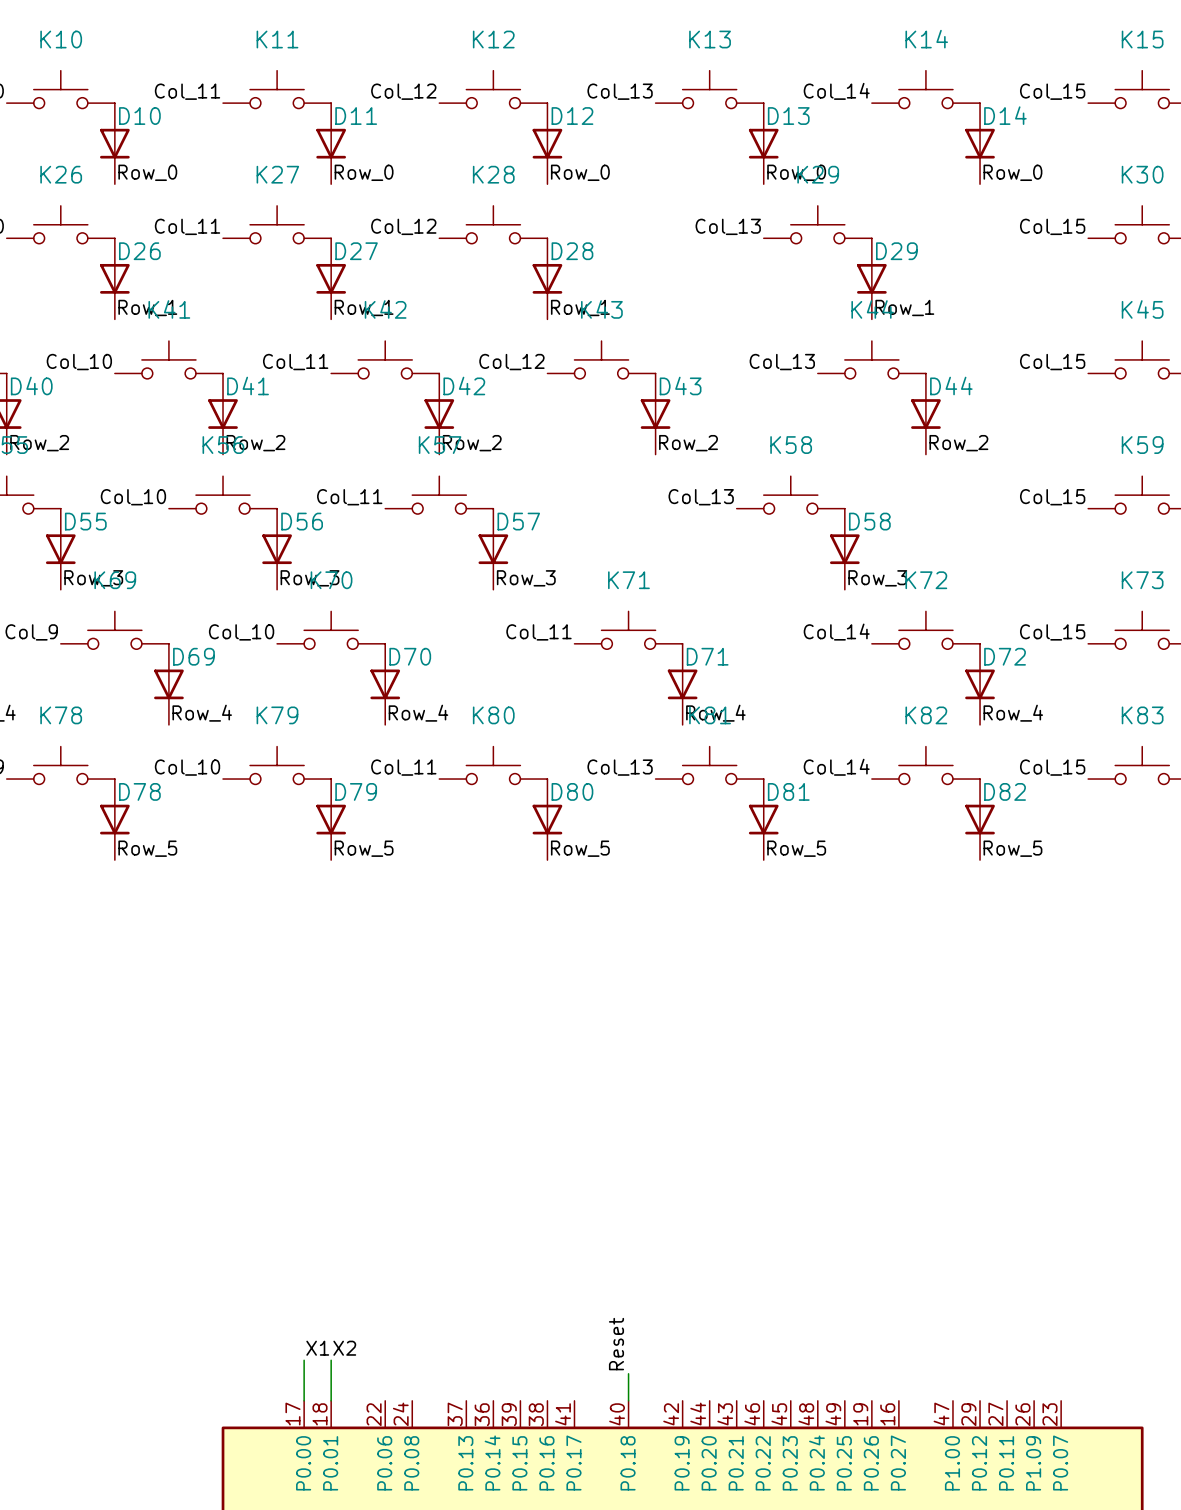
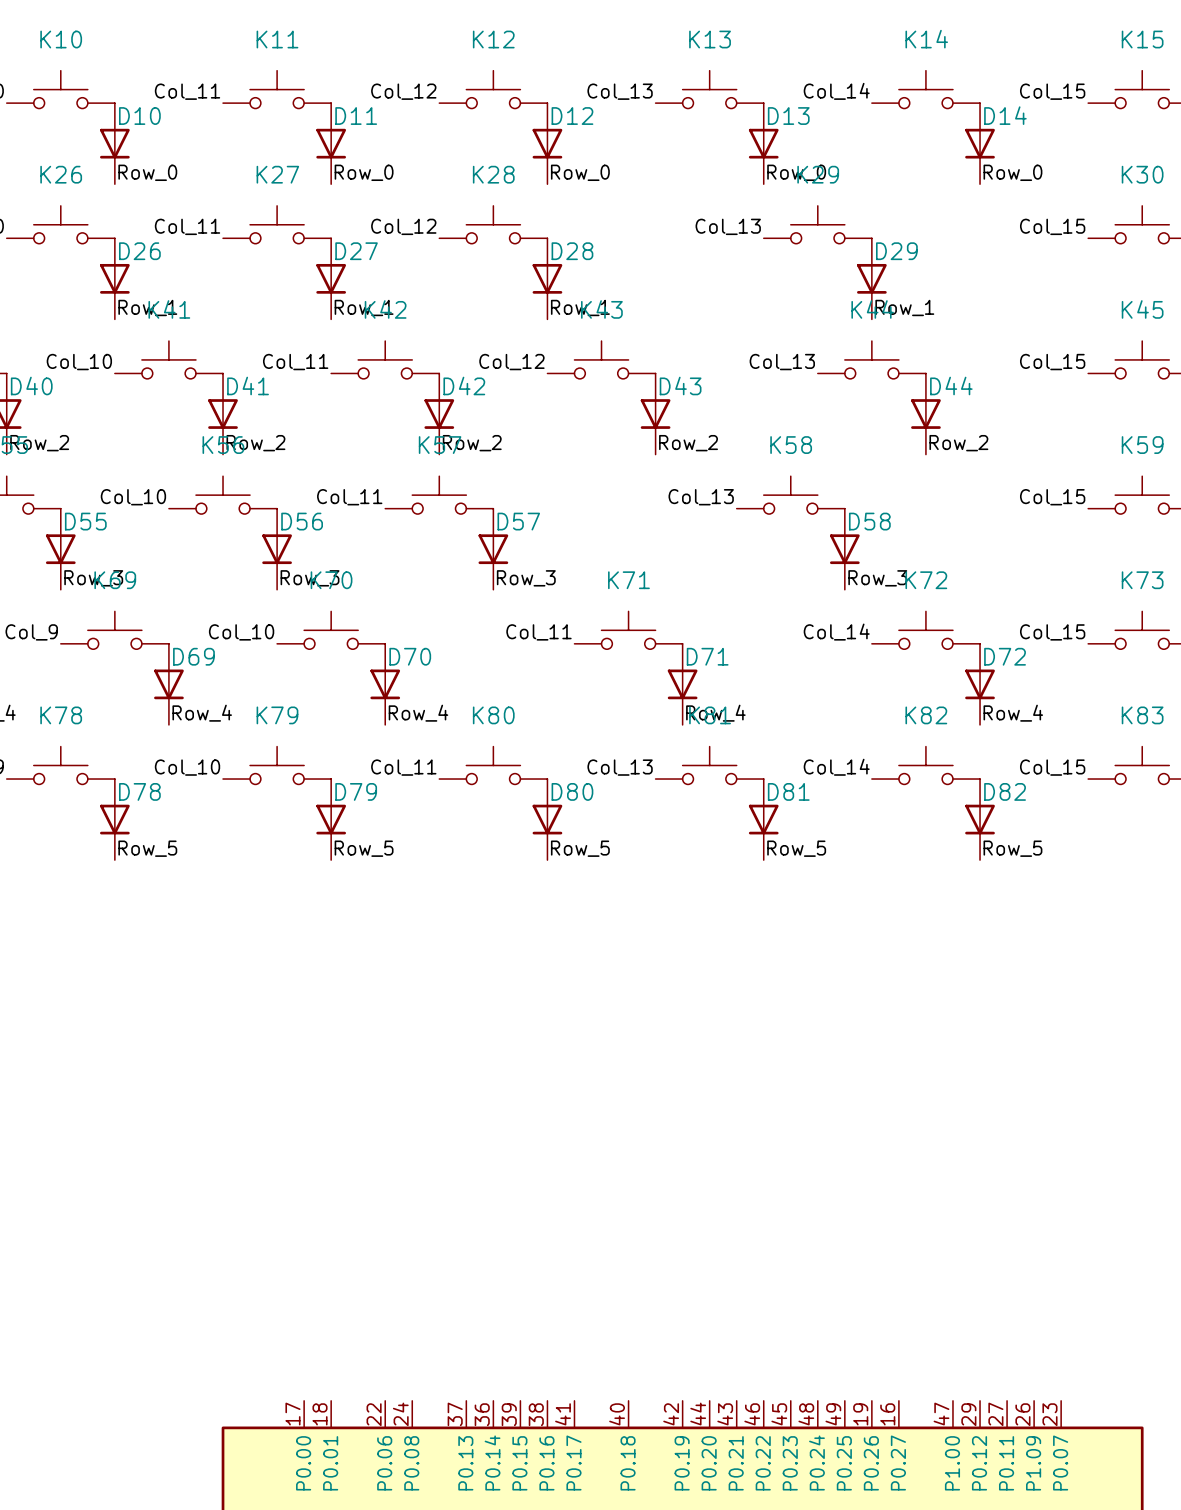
label: Reset (616, 1344) -> none
label: X1 (317, 1348) -> none
label: X2 (344, 1348) -> none
wire: (304, 1360) (304, 1400) -> none
wire: (331, 1360) (331, 1400) -> none
wire: (628, 1373) (628, 1400) -> none

